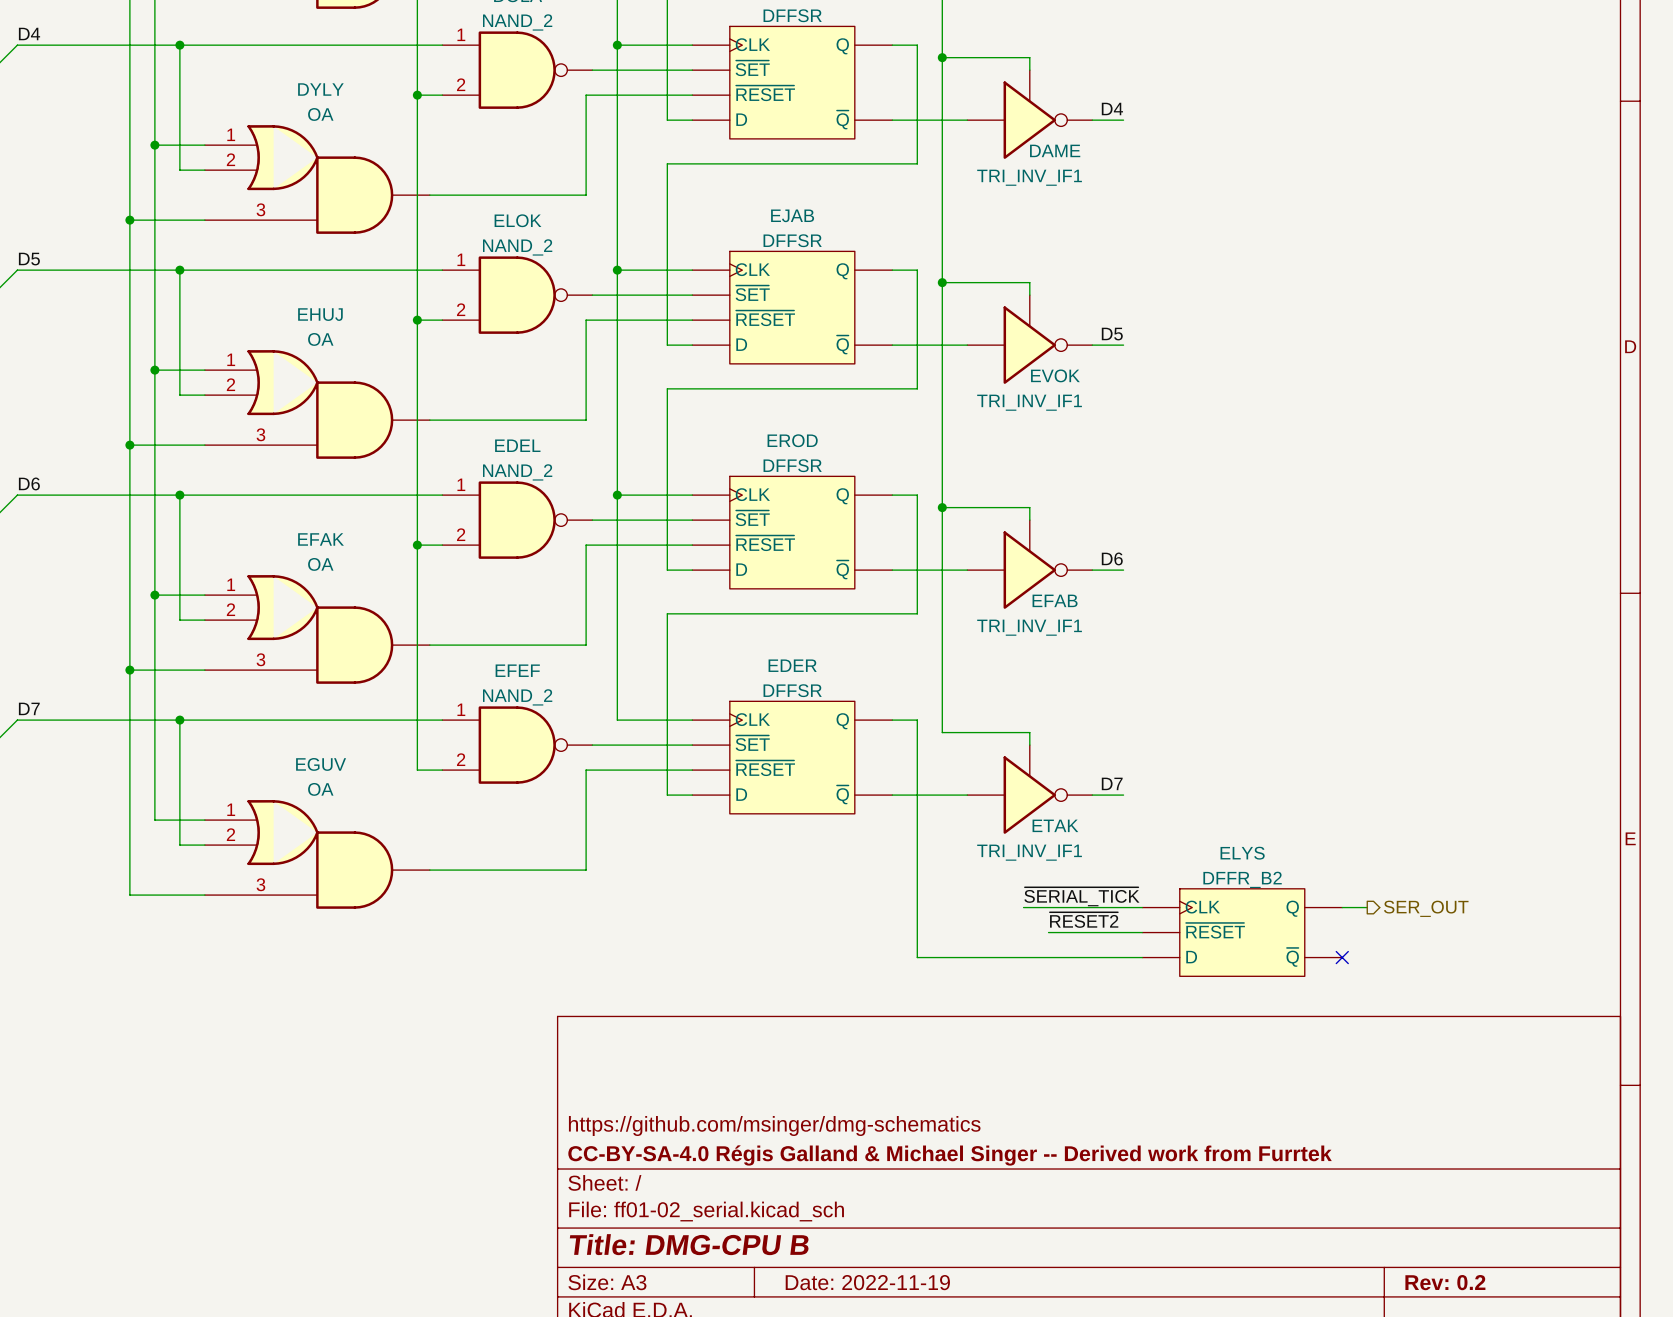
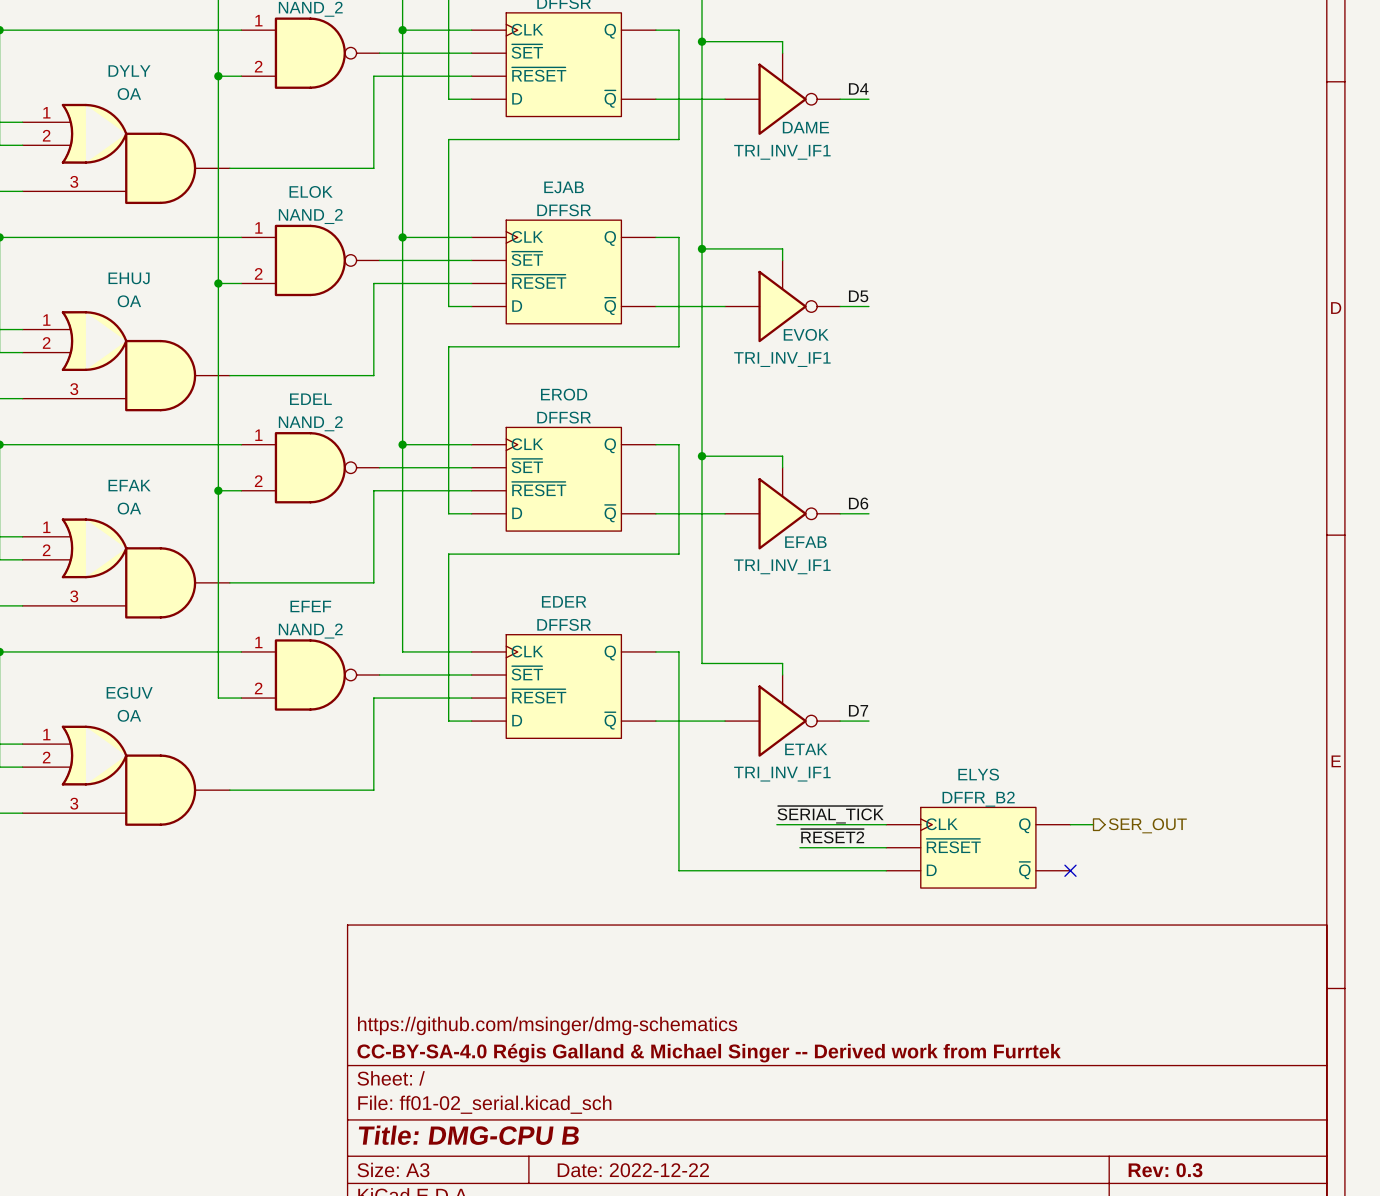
title block: Date: 2022-11-19 (867, 1282) -> Date: 2022-12-22 (633, 1170)
title block: Rev: 0.2 (1445, 1282) -> Rev: 0.3 (1165, 1170)

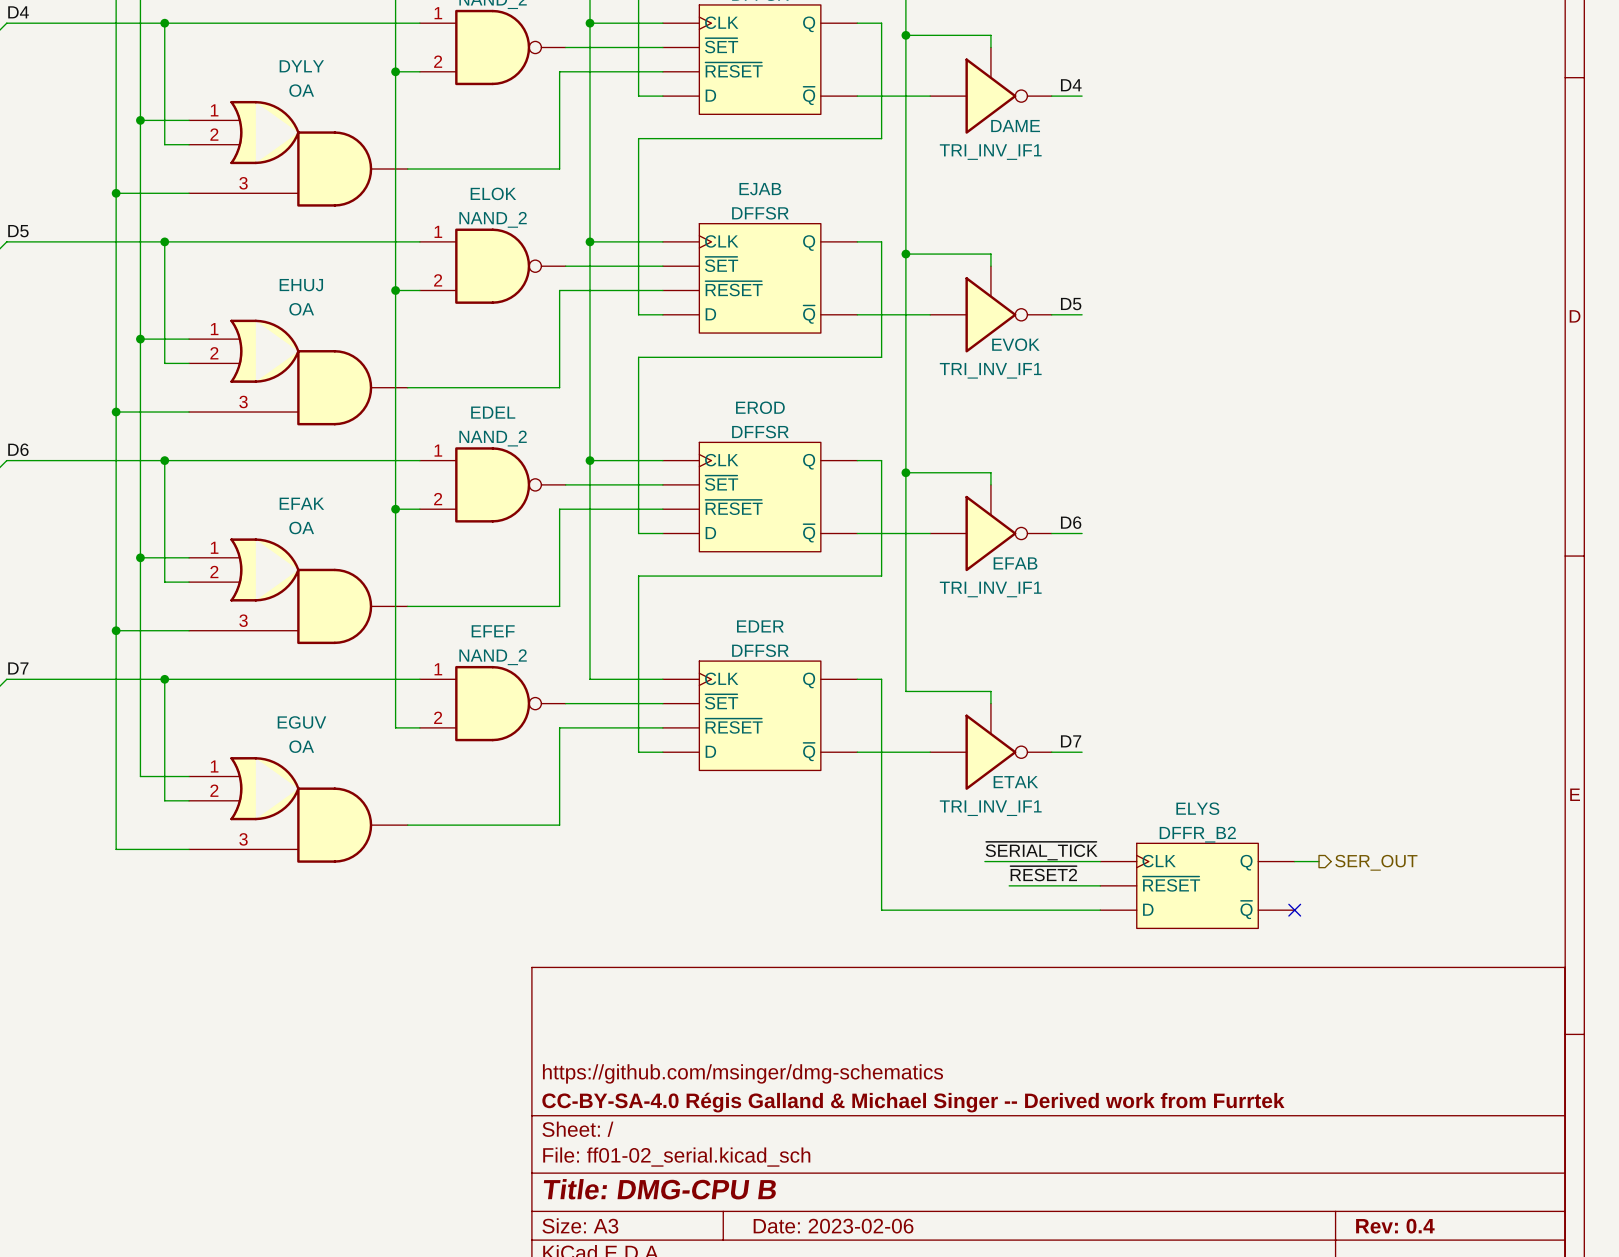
title block: Date: 2022-12-22 (633, 1170) -> Date: 2023-02-06 (833, 1226)
title block: Rev: 0.3 (1165, 1170) -> Rev: 0.4 (1395, 1226)

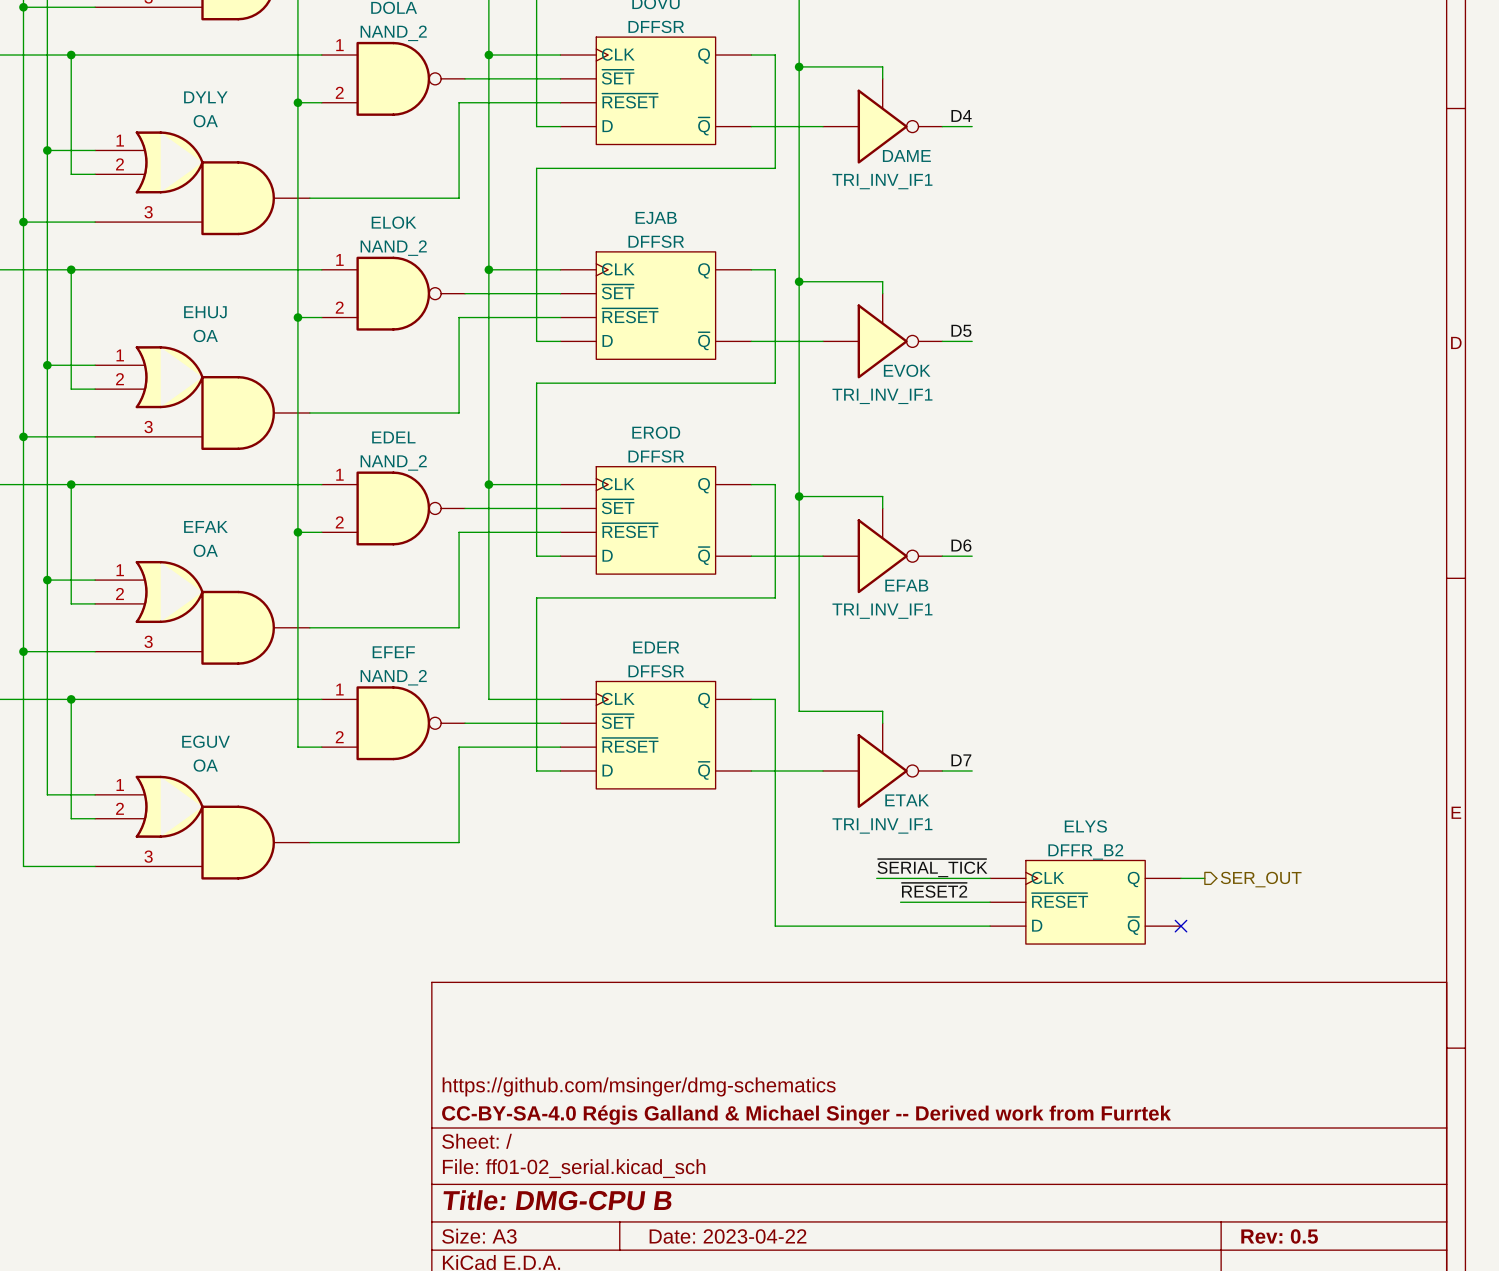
title block: Date: 2023-02-06 (833, 1226) -> Date: 2023-04-22 (728, 1236)
title block: Rev: 0.4 (1395, 1226) -> Rev: 0.5 (1279, 1236)

